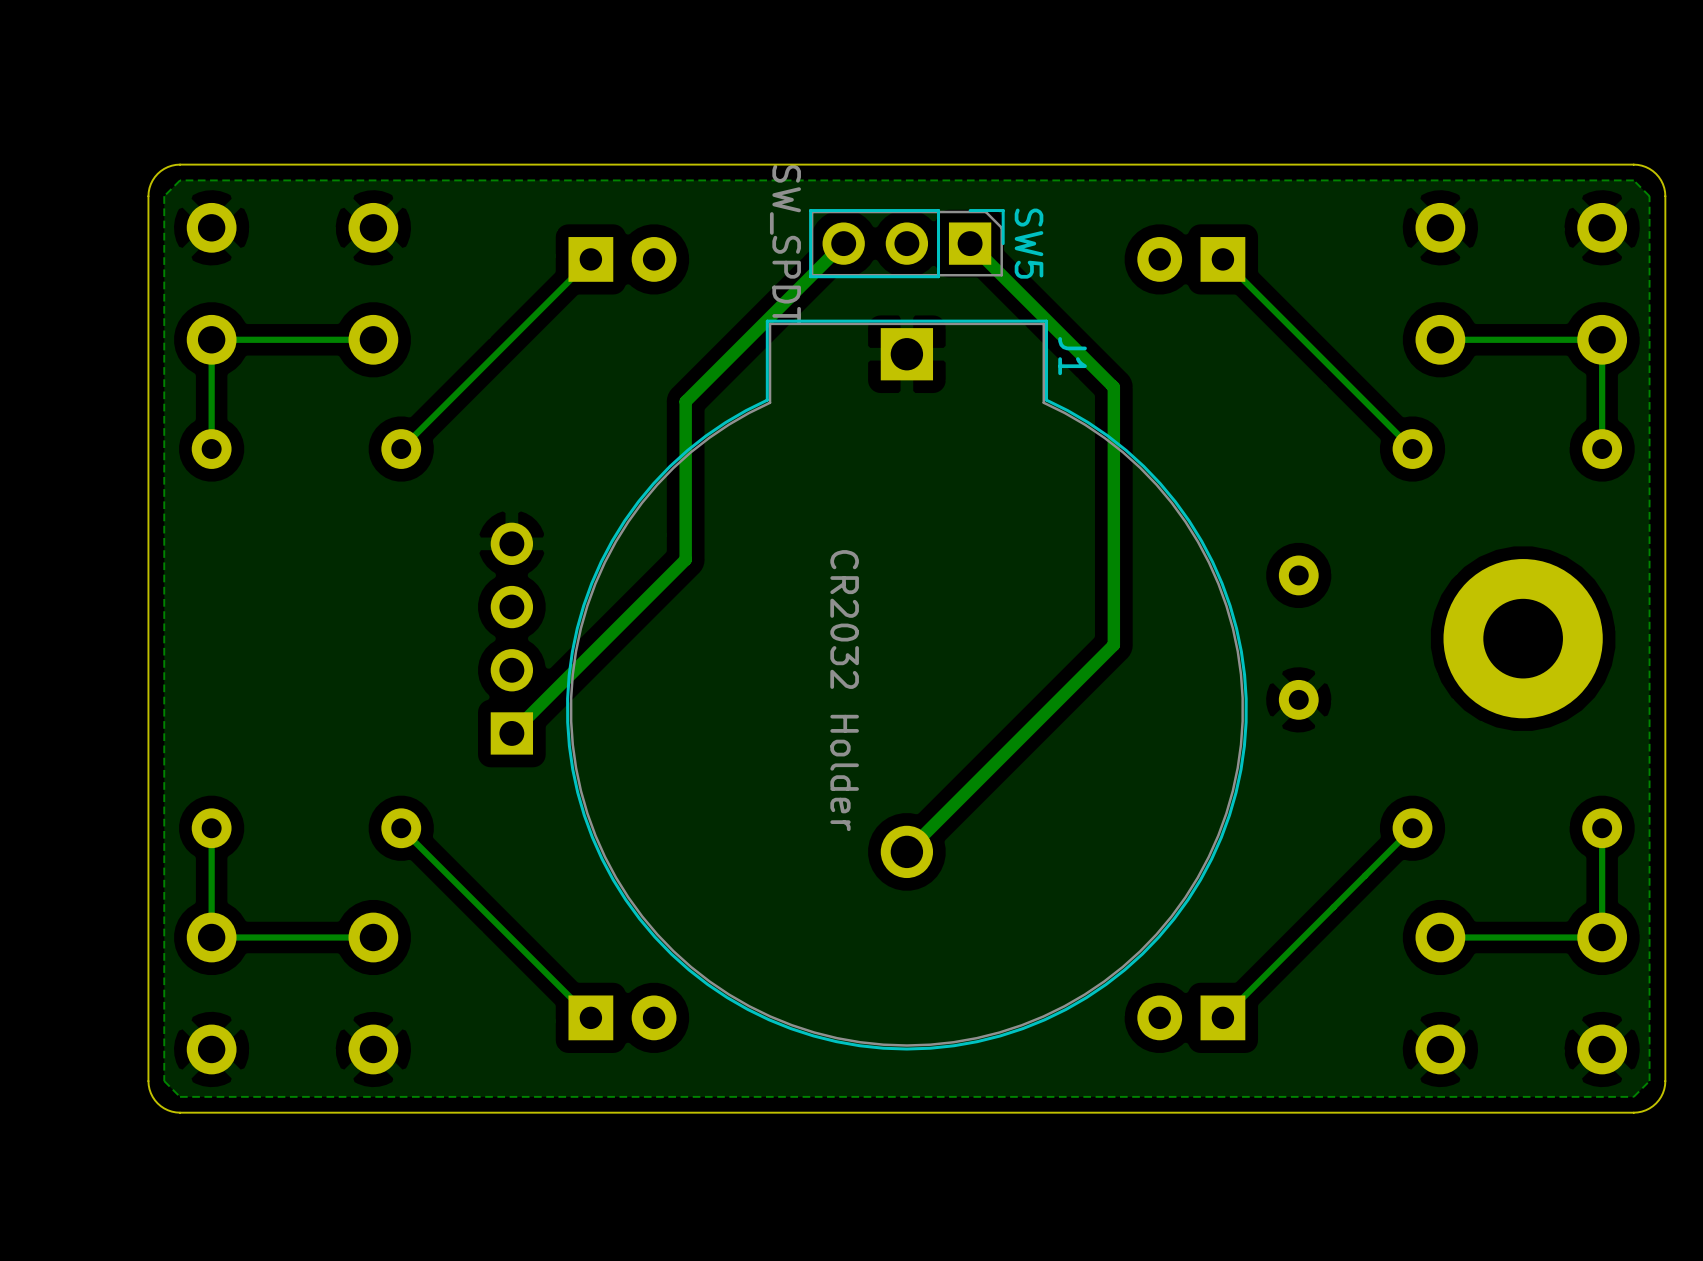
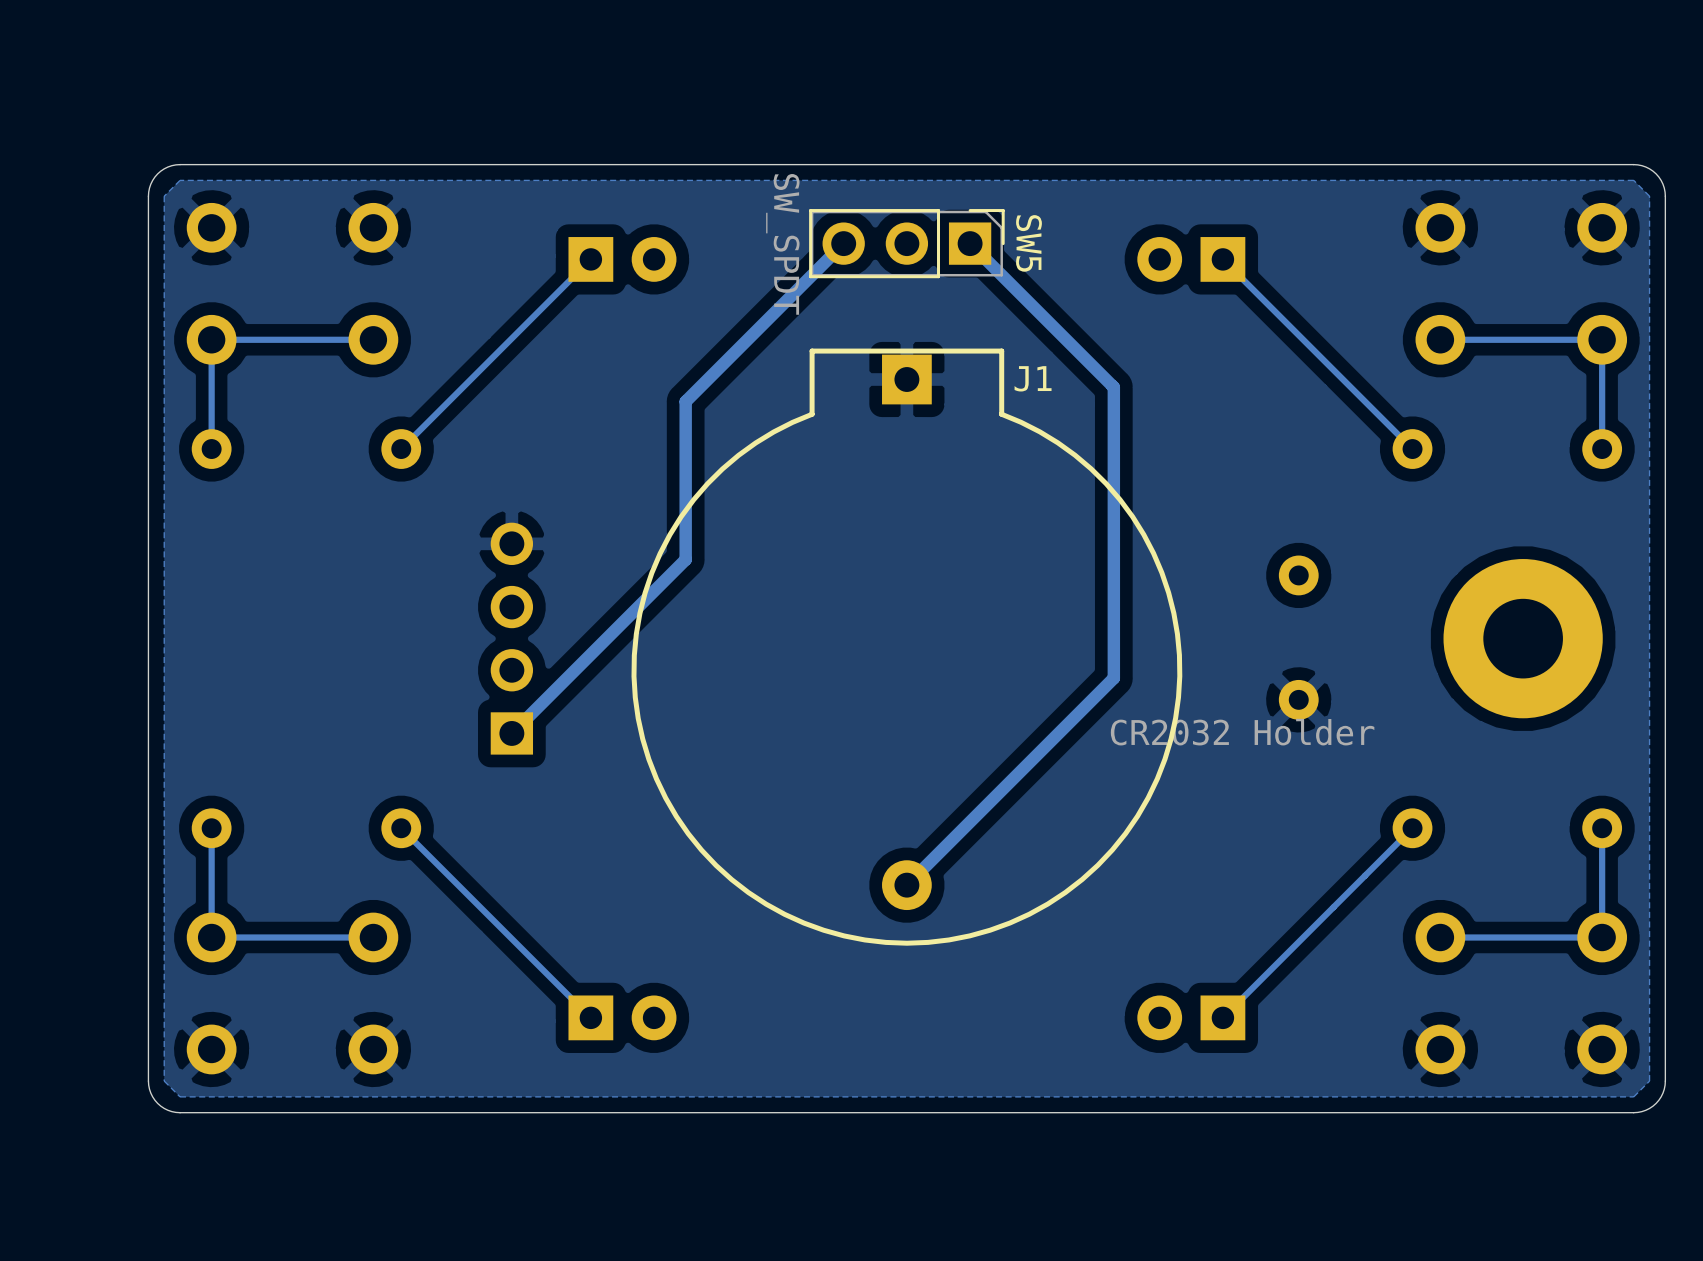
J1 footprint: [566, 319, 1248, 1051] -> [631, 348, 1183, 946]
J1 name position: J1 (1072, 356) -> J1 (1033, 378)
track: (1113, 644) (906, 851) -> (1113, 644) (1113, 678) (906, 885)
J1 value position: CR2032 Holder (844, 690) -> CR2032 Holder (1242, 732)

